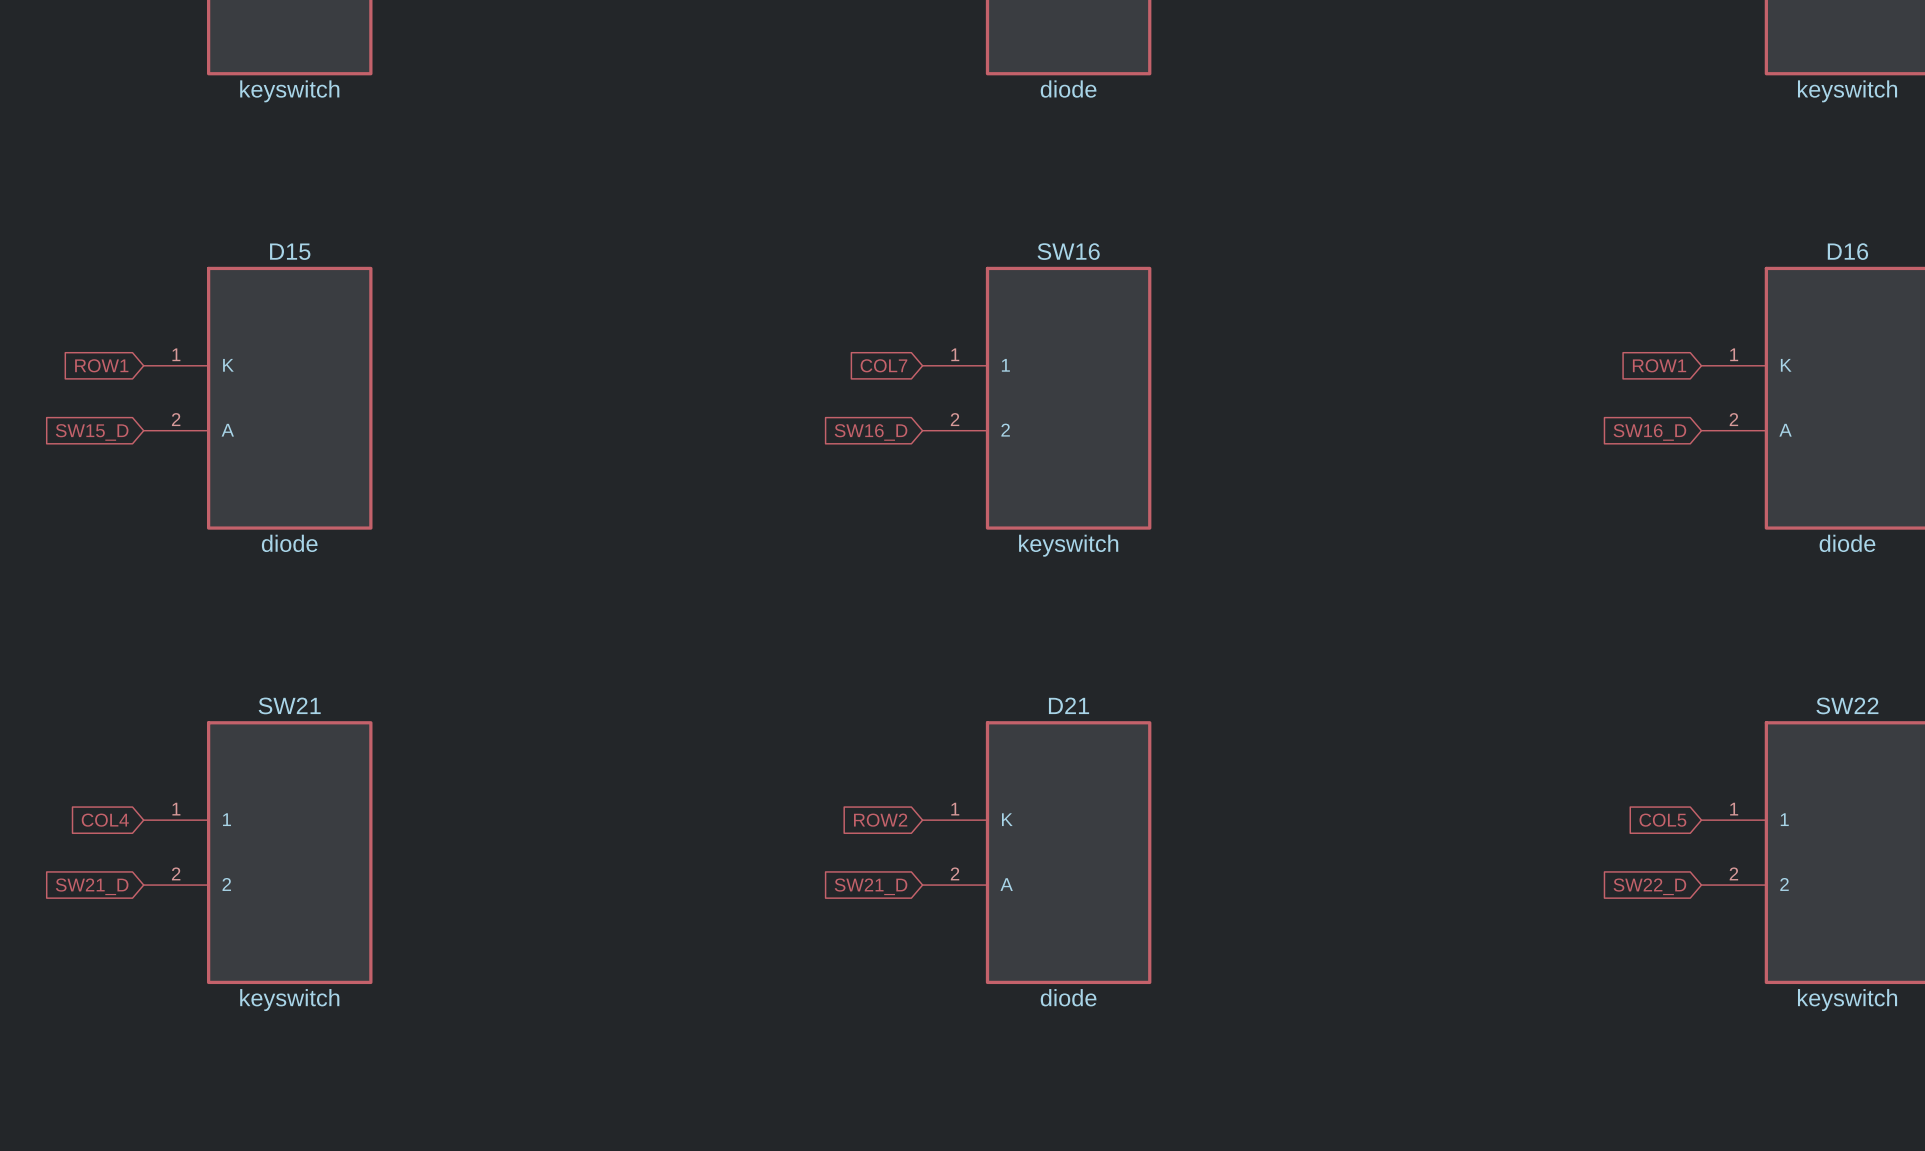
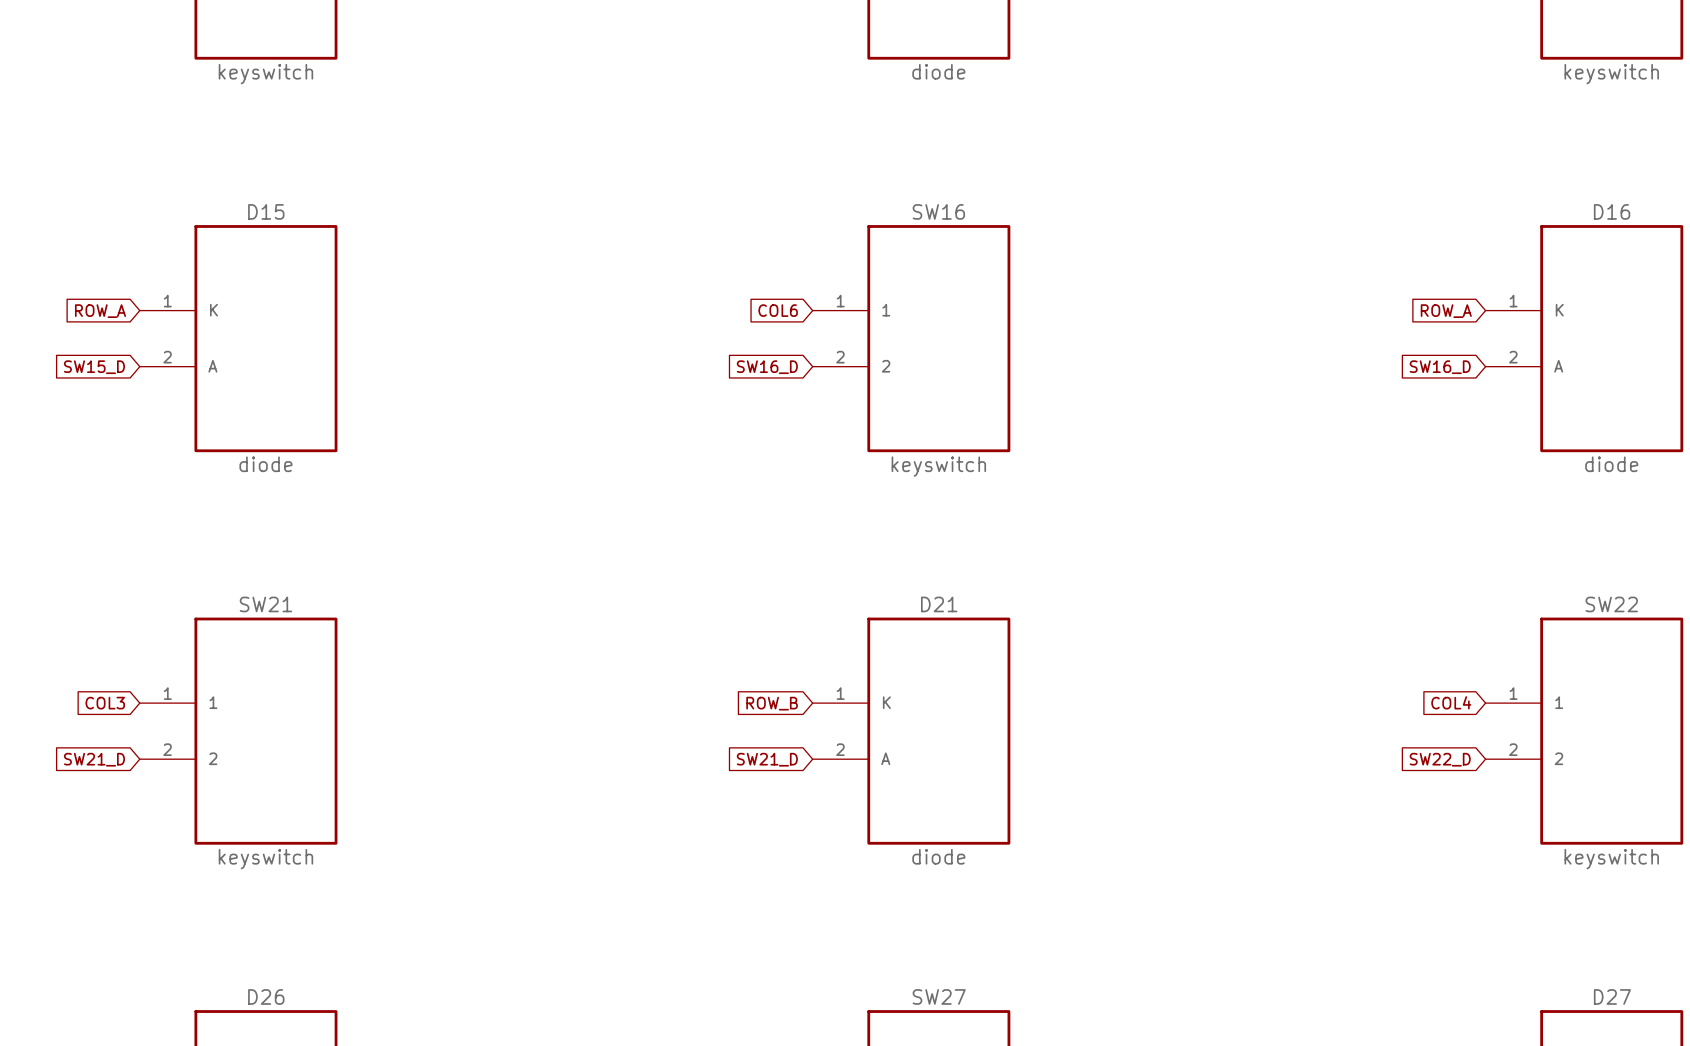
global label: ROW1 (101, 365) -> ROW_A (100, 311)
global label: COL7 (883, 365) -> COL6 (778, 310)
global label: ROW1 (1659, 365) -> ROW_A (1446, 311)
global label: COL4 (105, 820) -> COL3 (105, 703)
global label: ROW2 (880, 820) -> ROW_B (772, 703)
global label: COL5 (1662, 820) -> COL4 (1451, 702)

